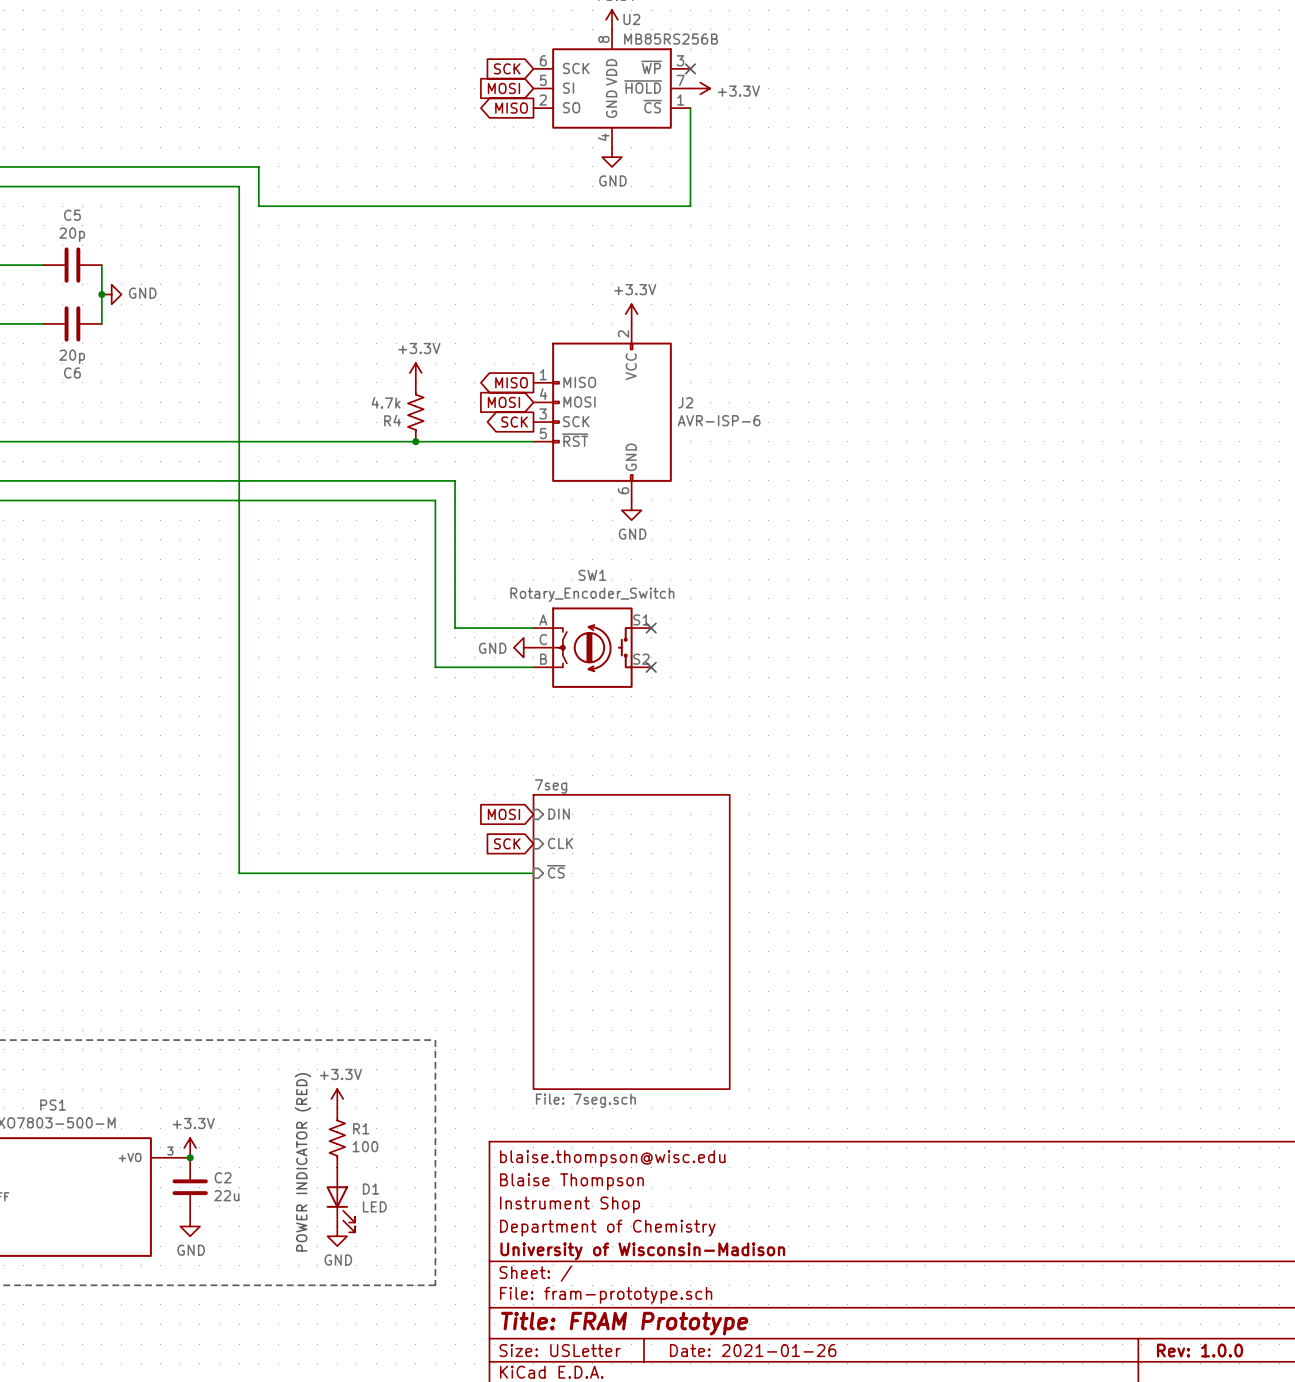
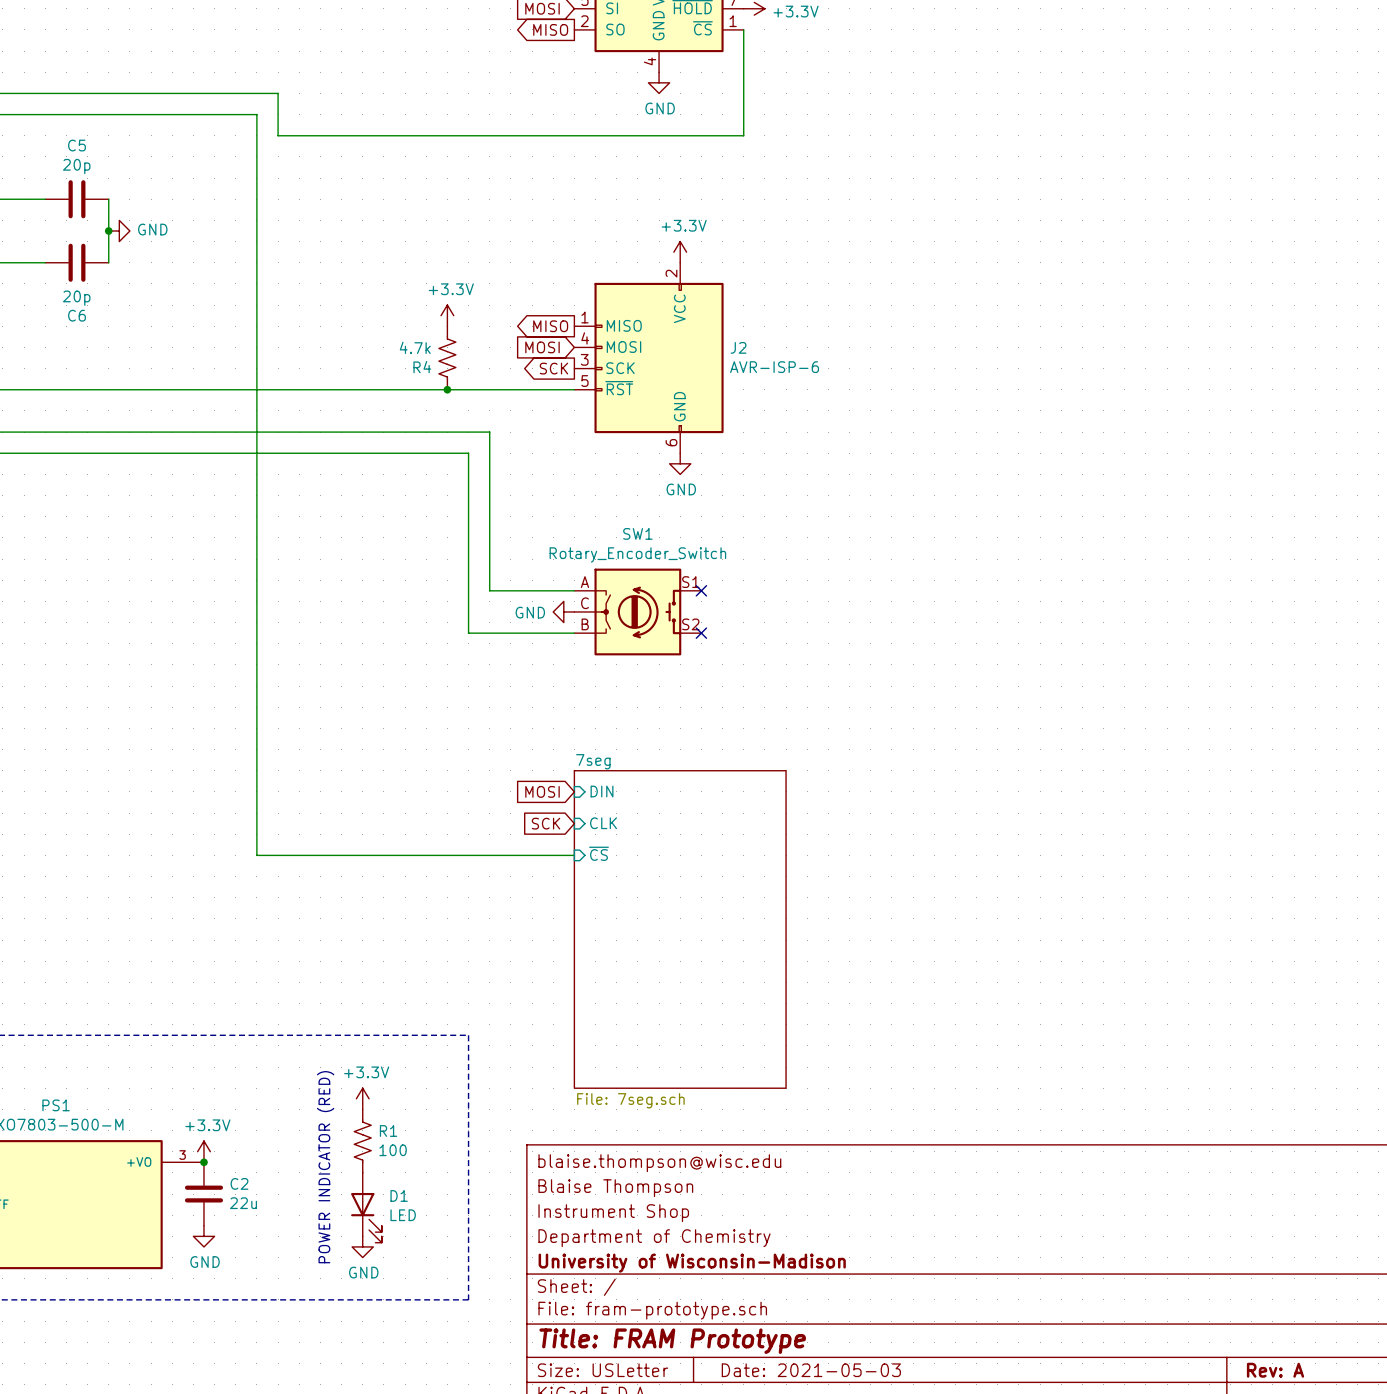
title block: Date: 2021-01-26 (753, 1350) -> Date: 2021-05-03 (811, 1370)
title block: Rev: 1.0.0 (1200, 1350) -> Rev: A (1275, 1370)

